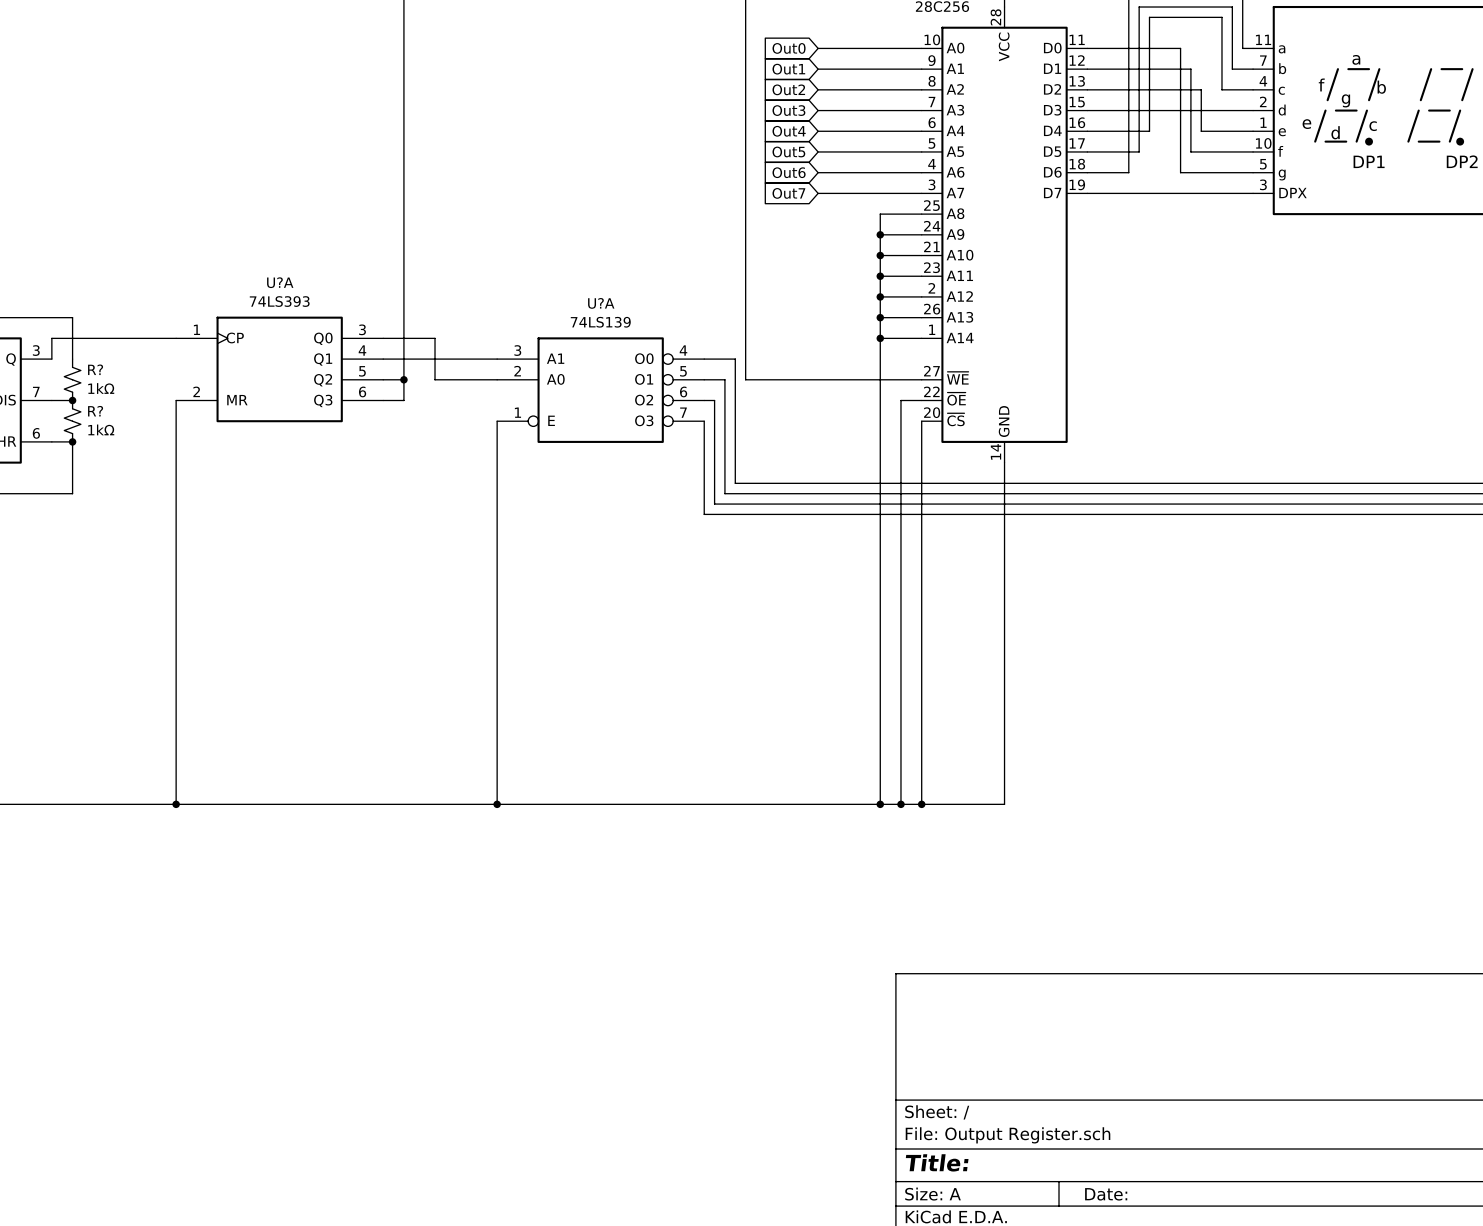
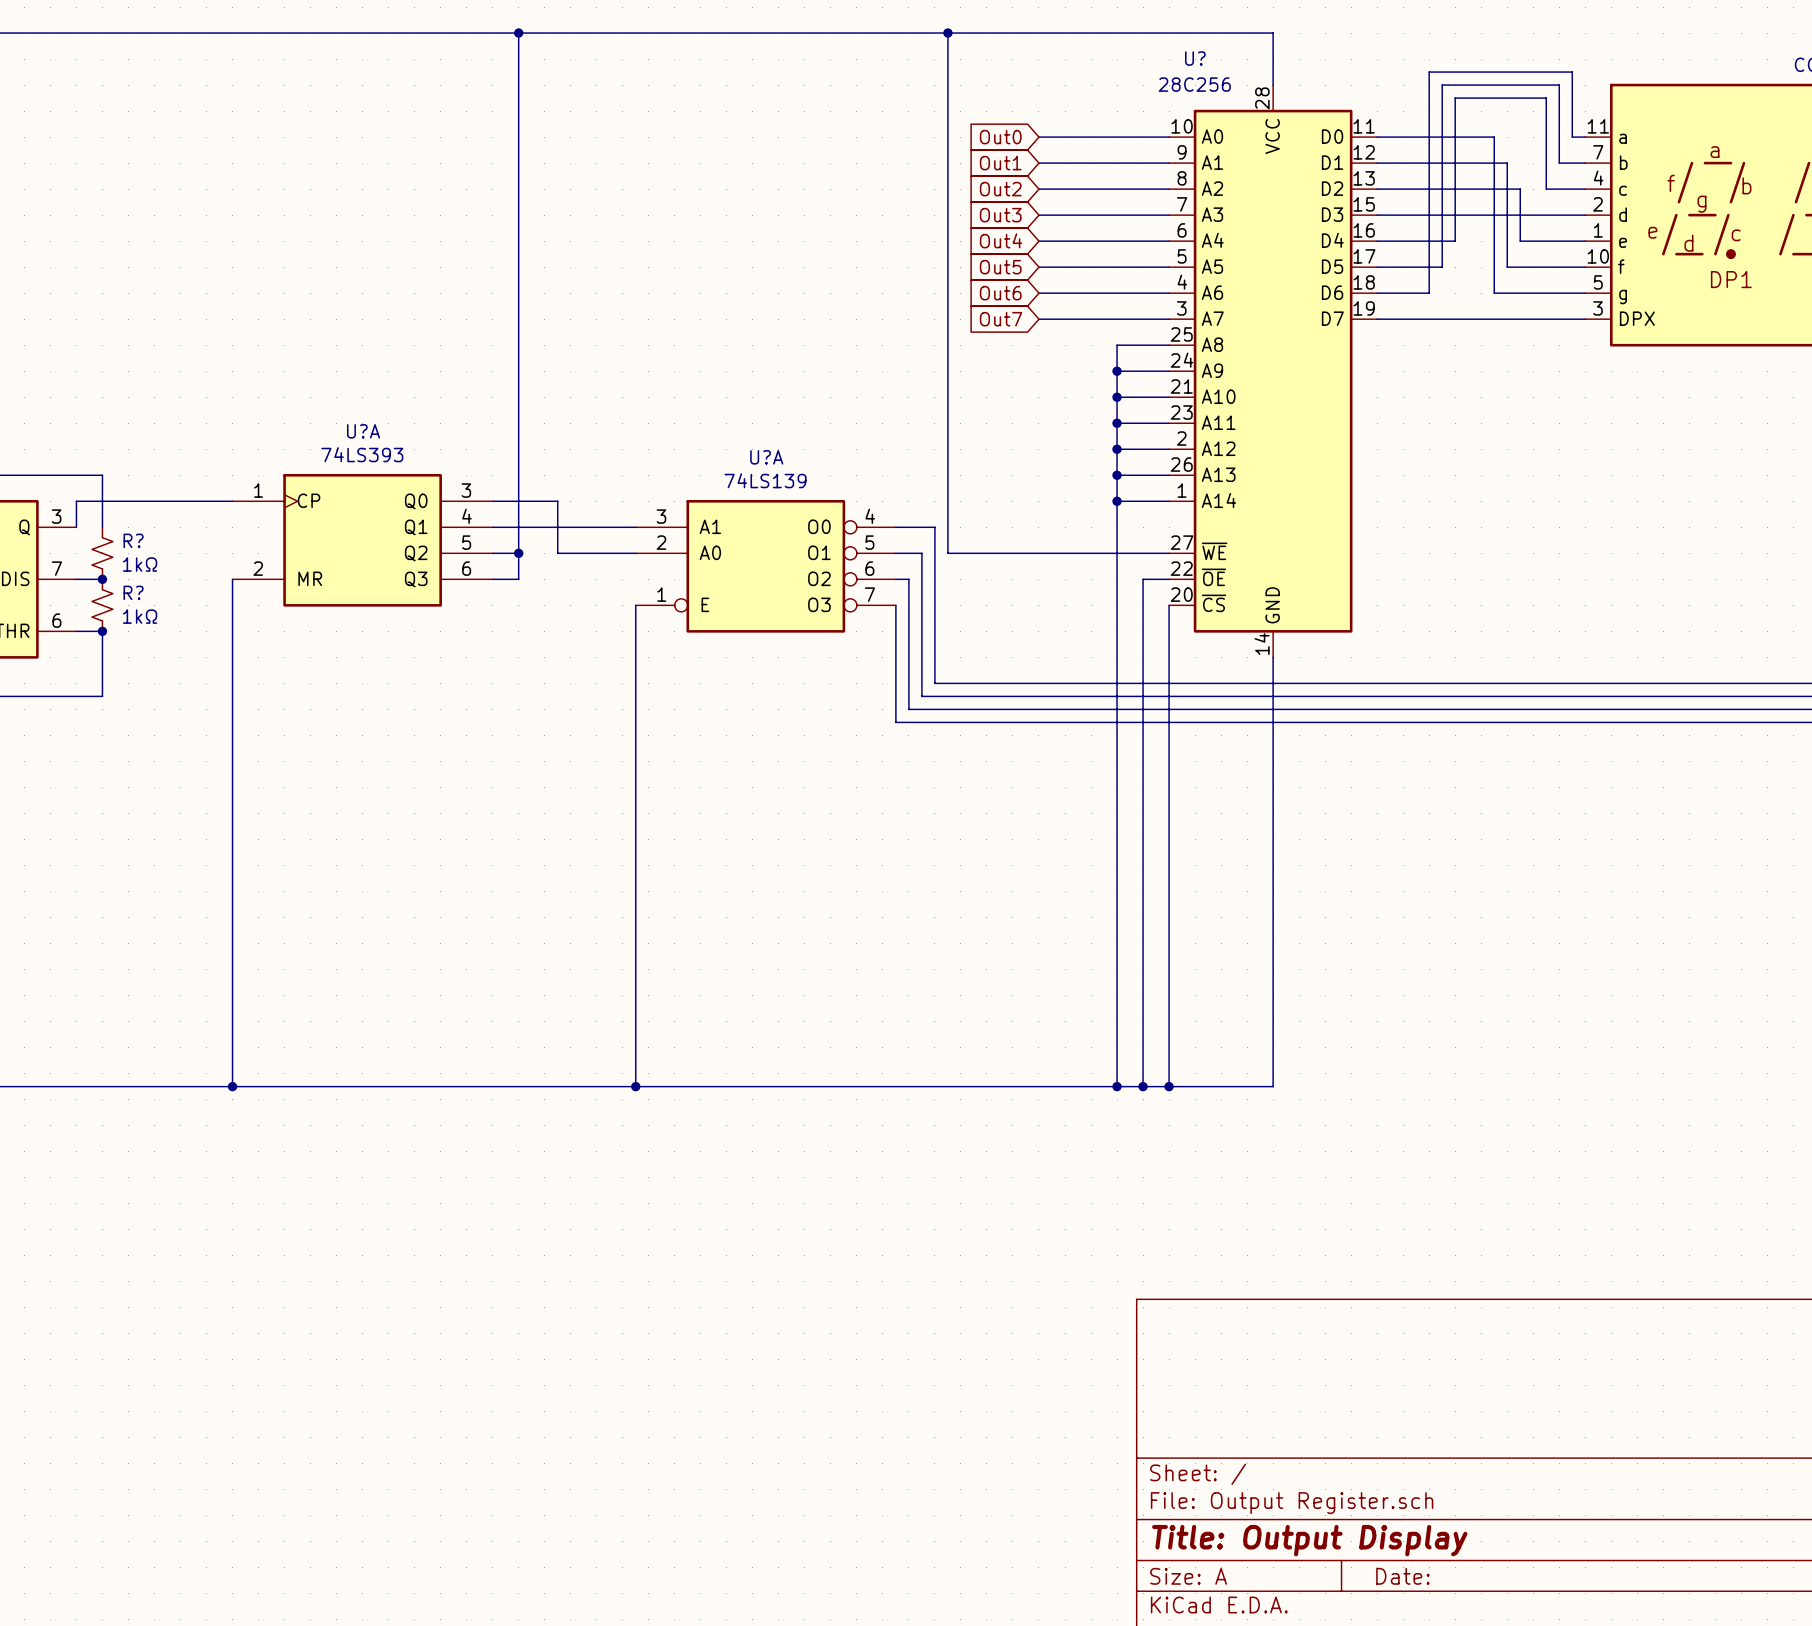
title block: Title: (937, 1162) -> Title: Output Display (1309, 1540)

